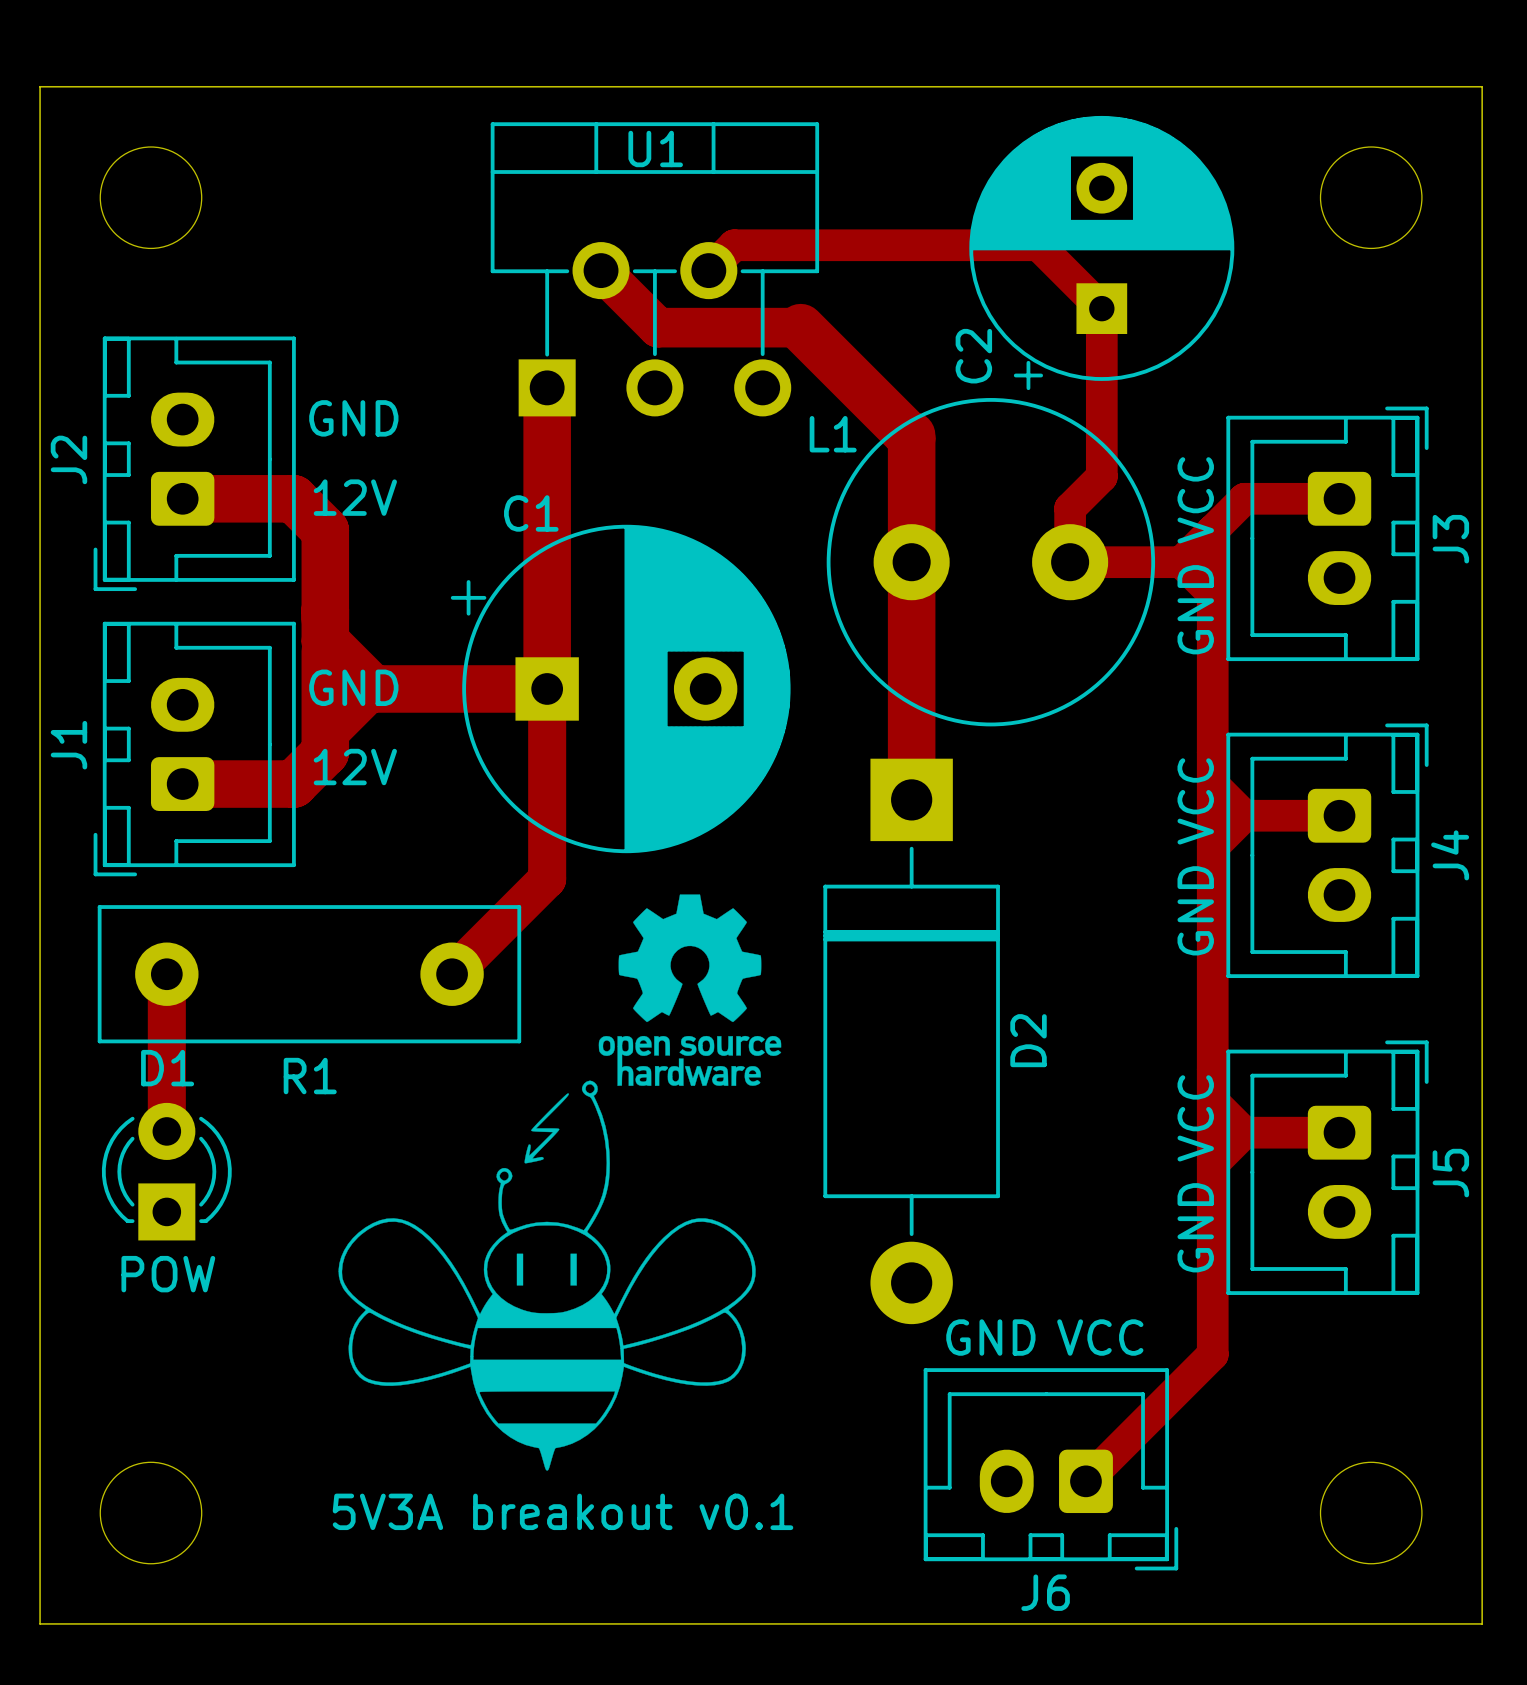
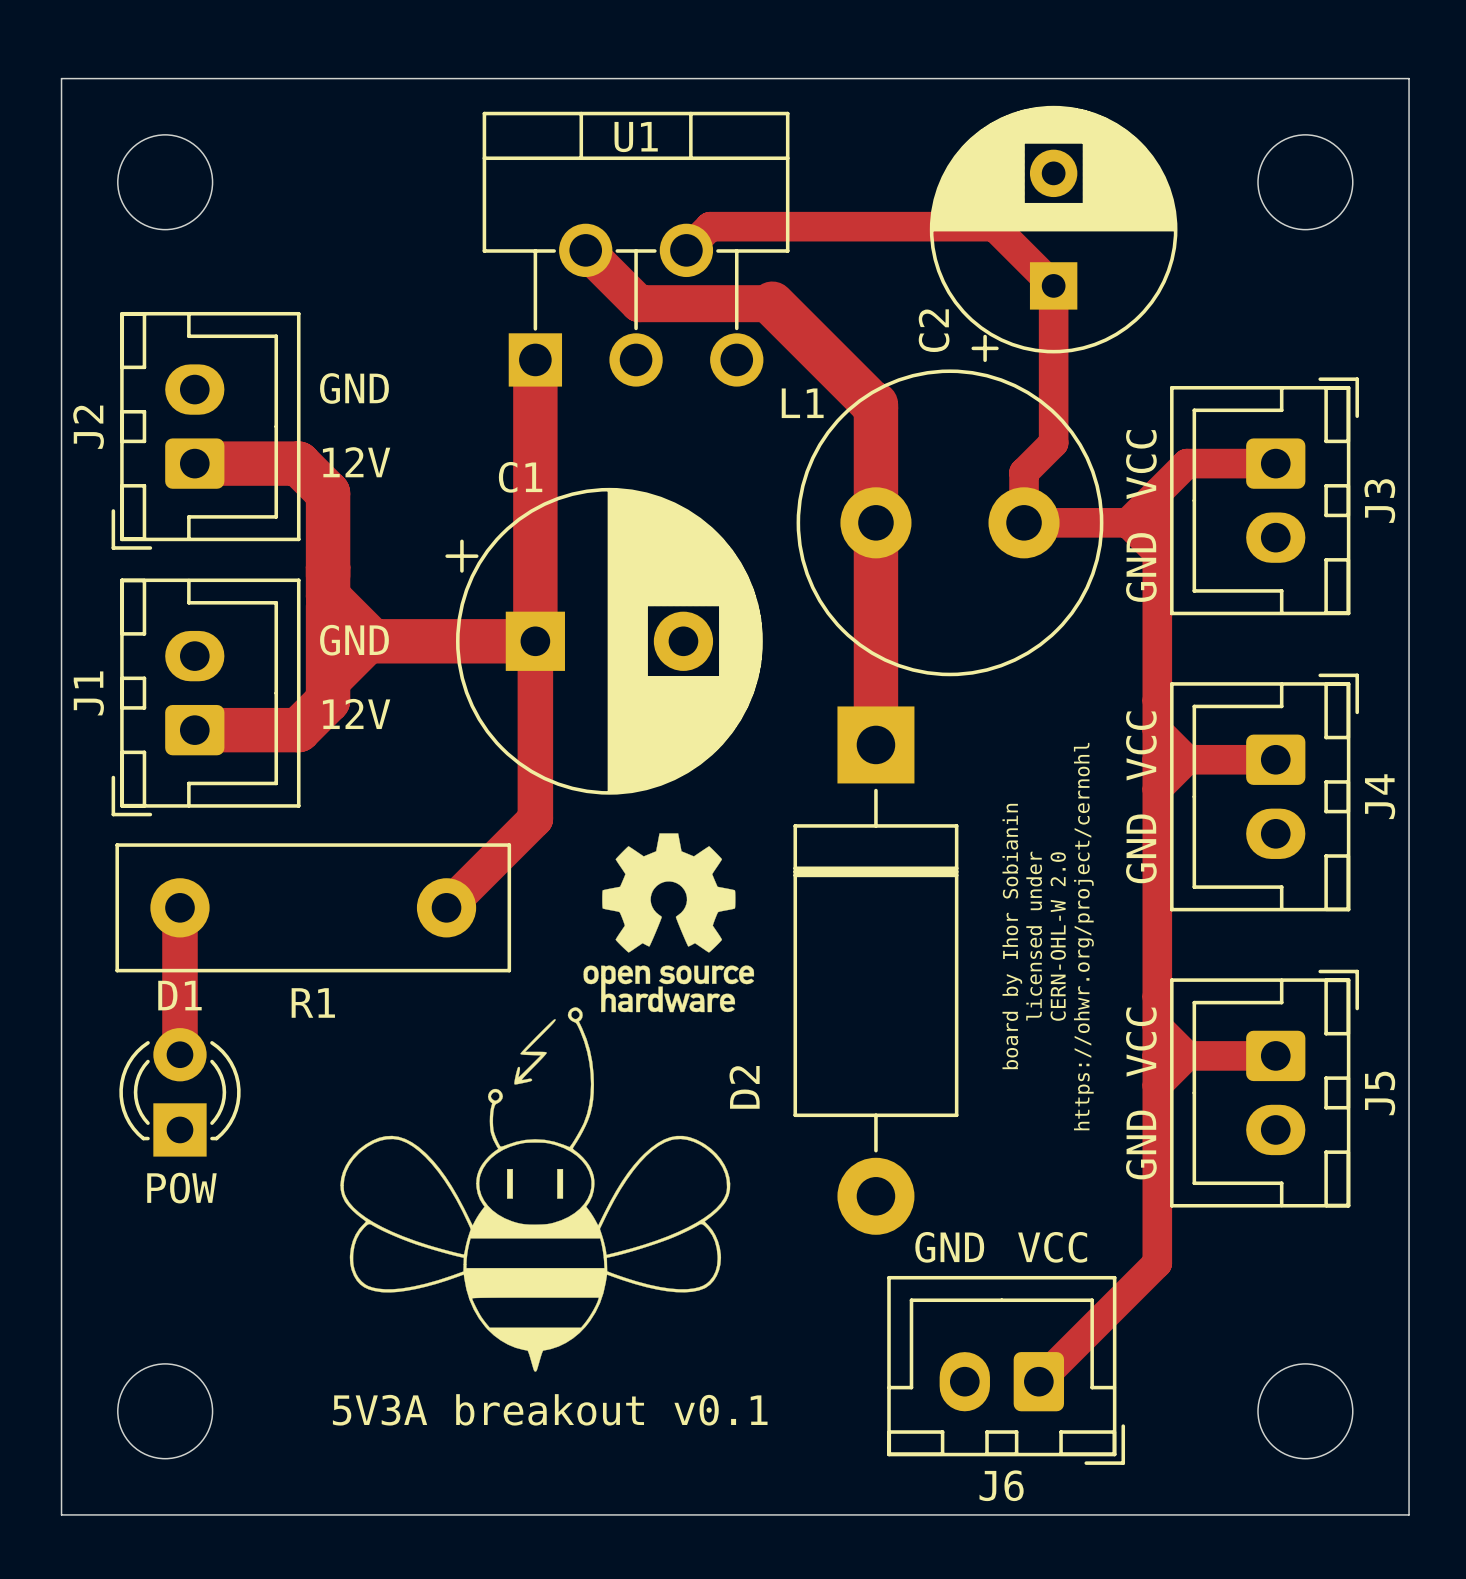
text: none -> licensed under (1034, 936)
text: none -> board by Ihor Sobianin (1012, 936)
text: none -> CERN-OHL-W 2.0 (1058, 936)
text: none -> https://ohwr.org/project/cernohl (1083, 936)
D2 name position: D2 (1028, 1040) -> D2 (744, 1087)

